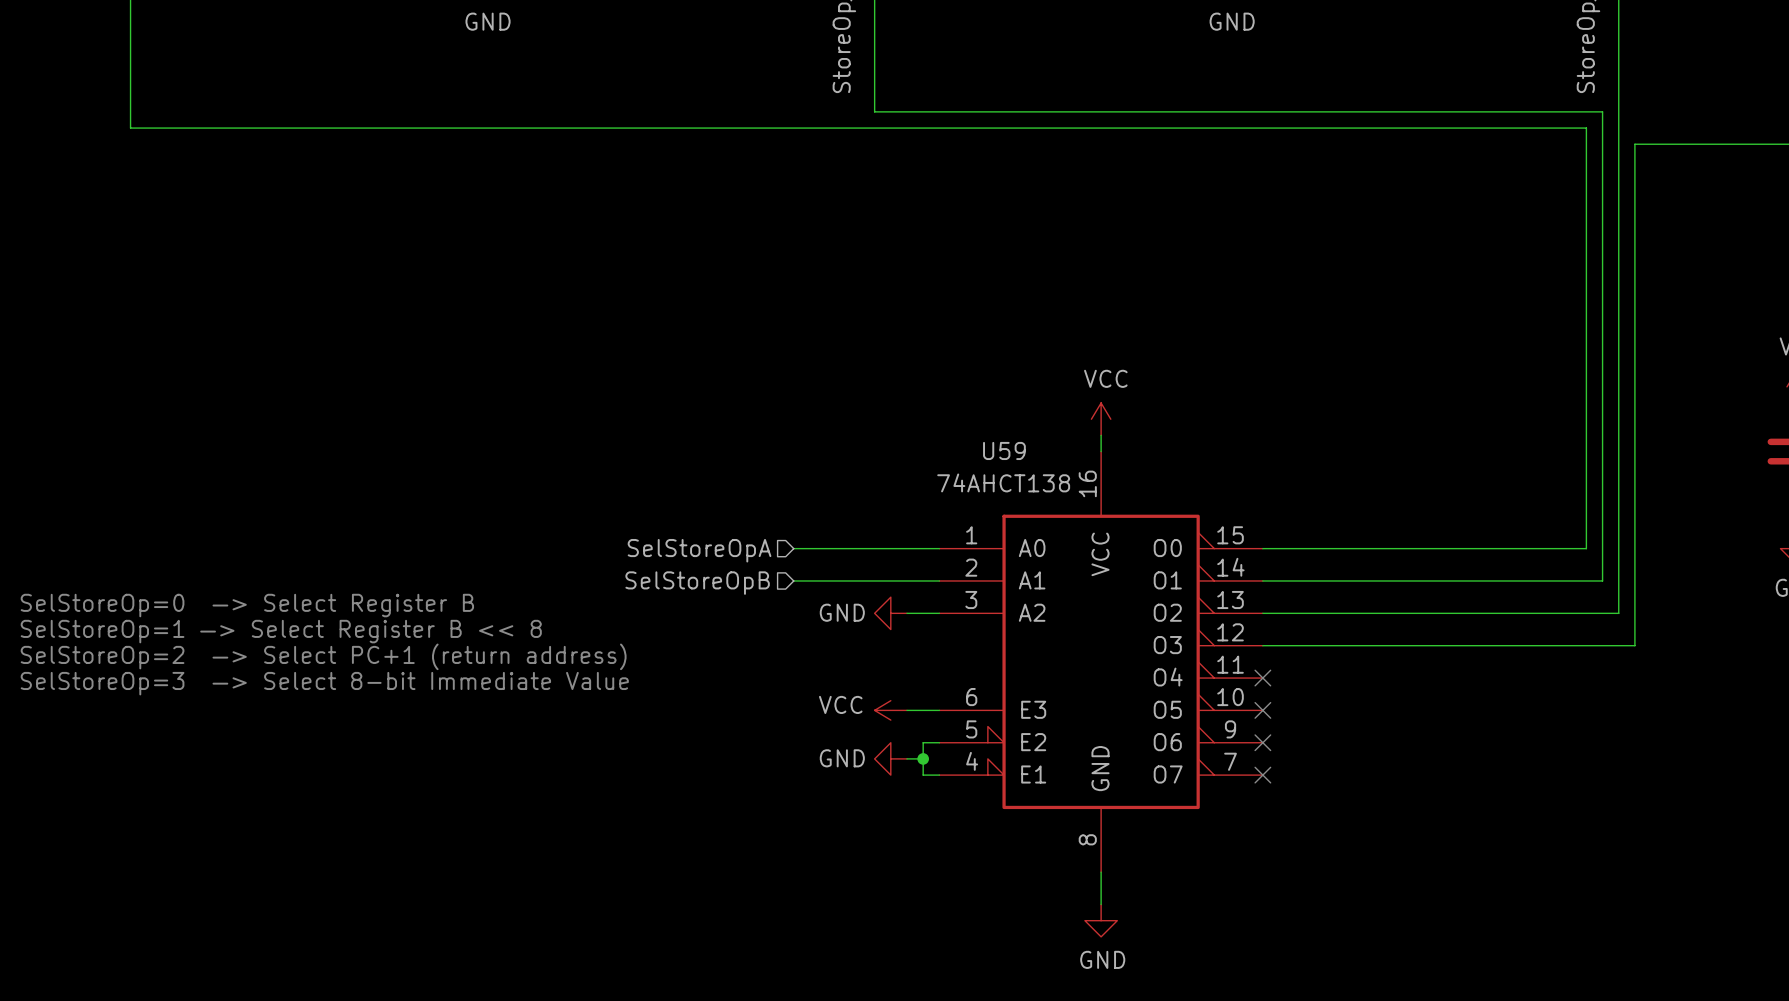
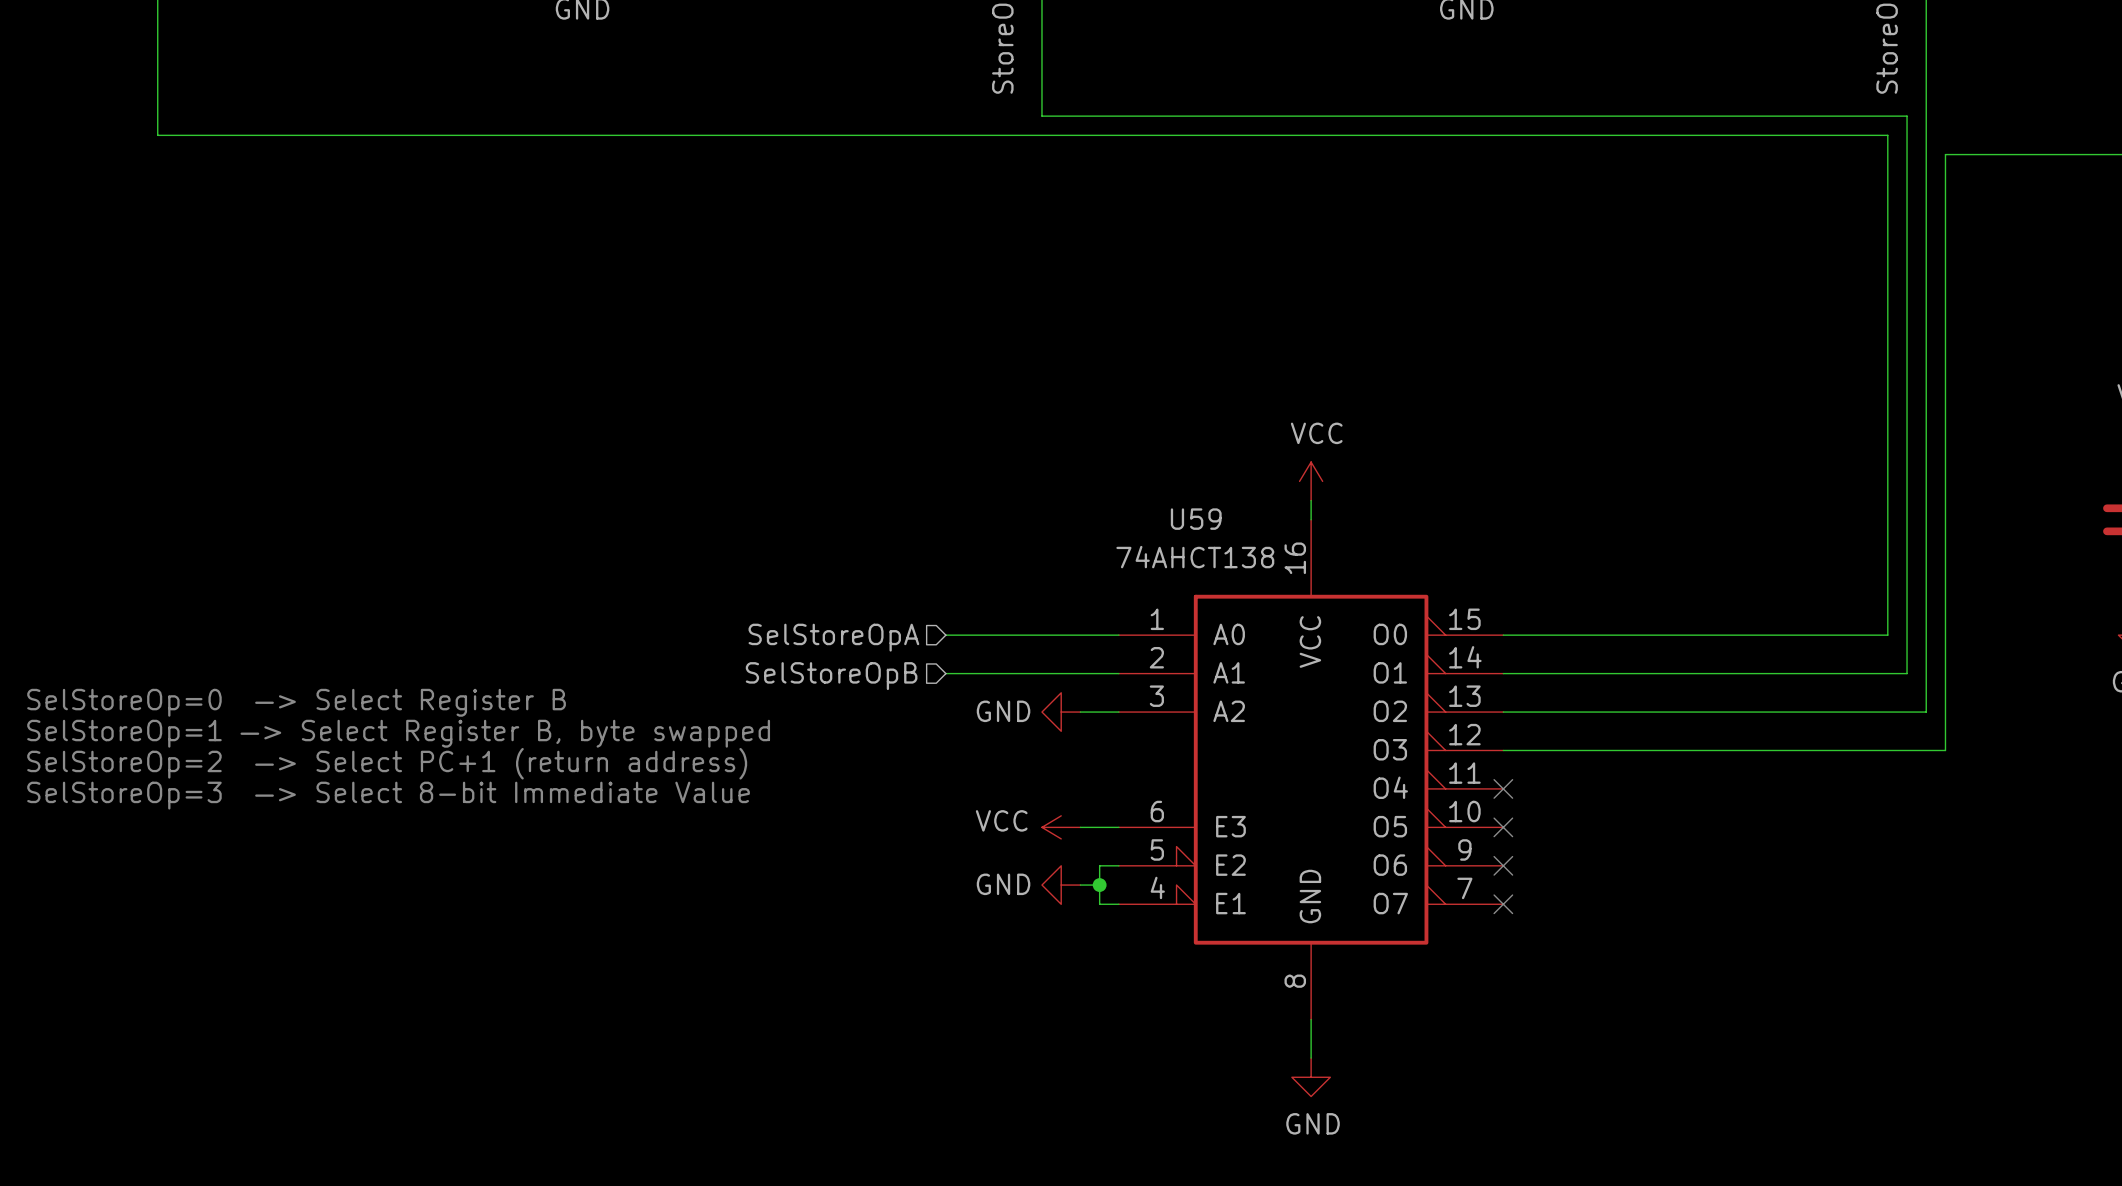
text: SelStoreOp=1 —> Select Register B << 8 (281, 631) -> SelStoreOp=1 —> Select Register B, byte swapped (398, 733)

